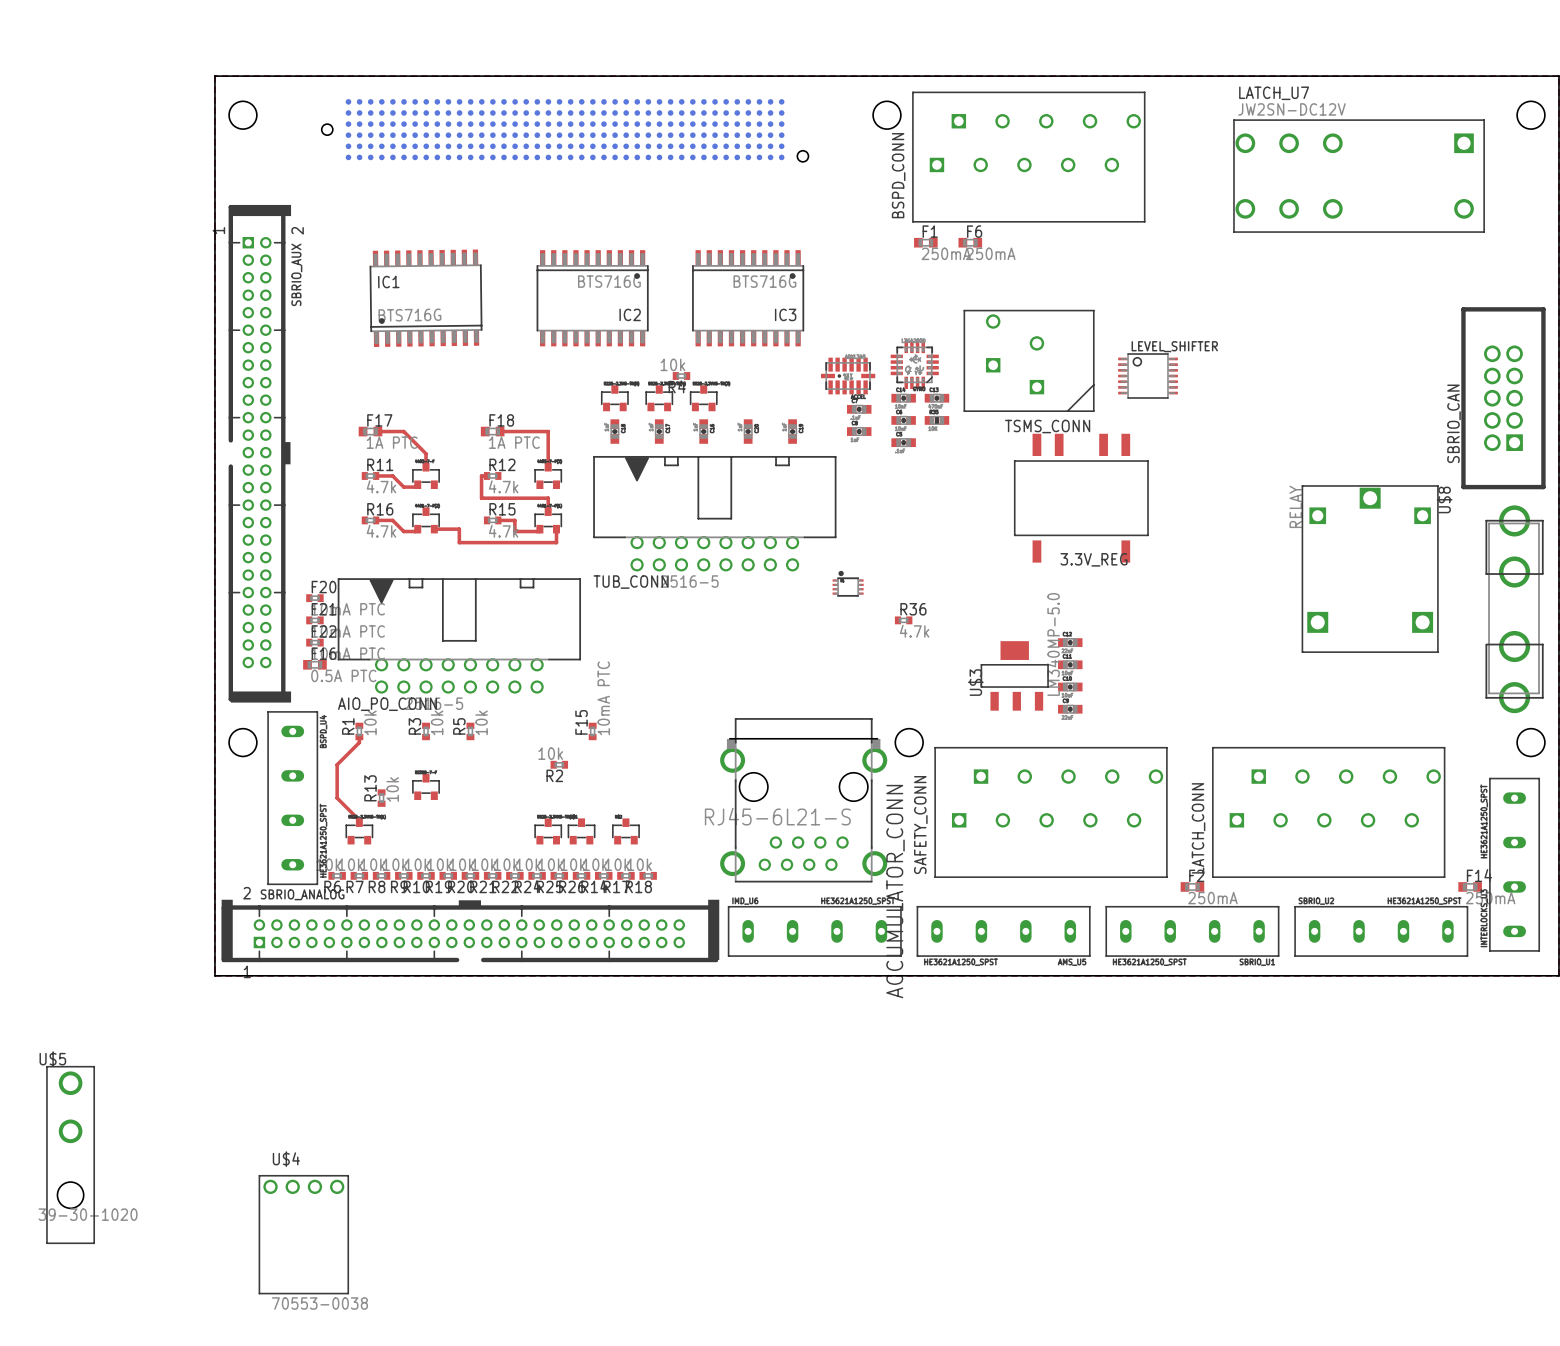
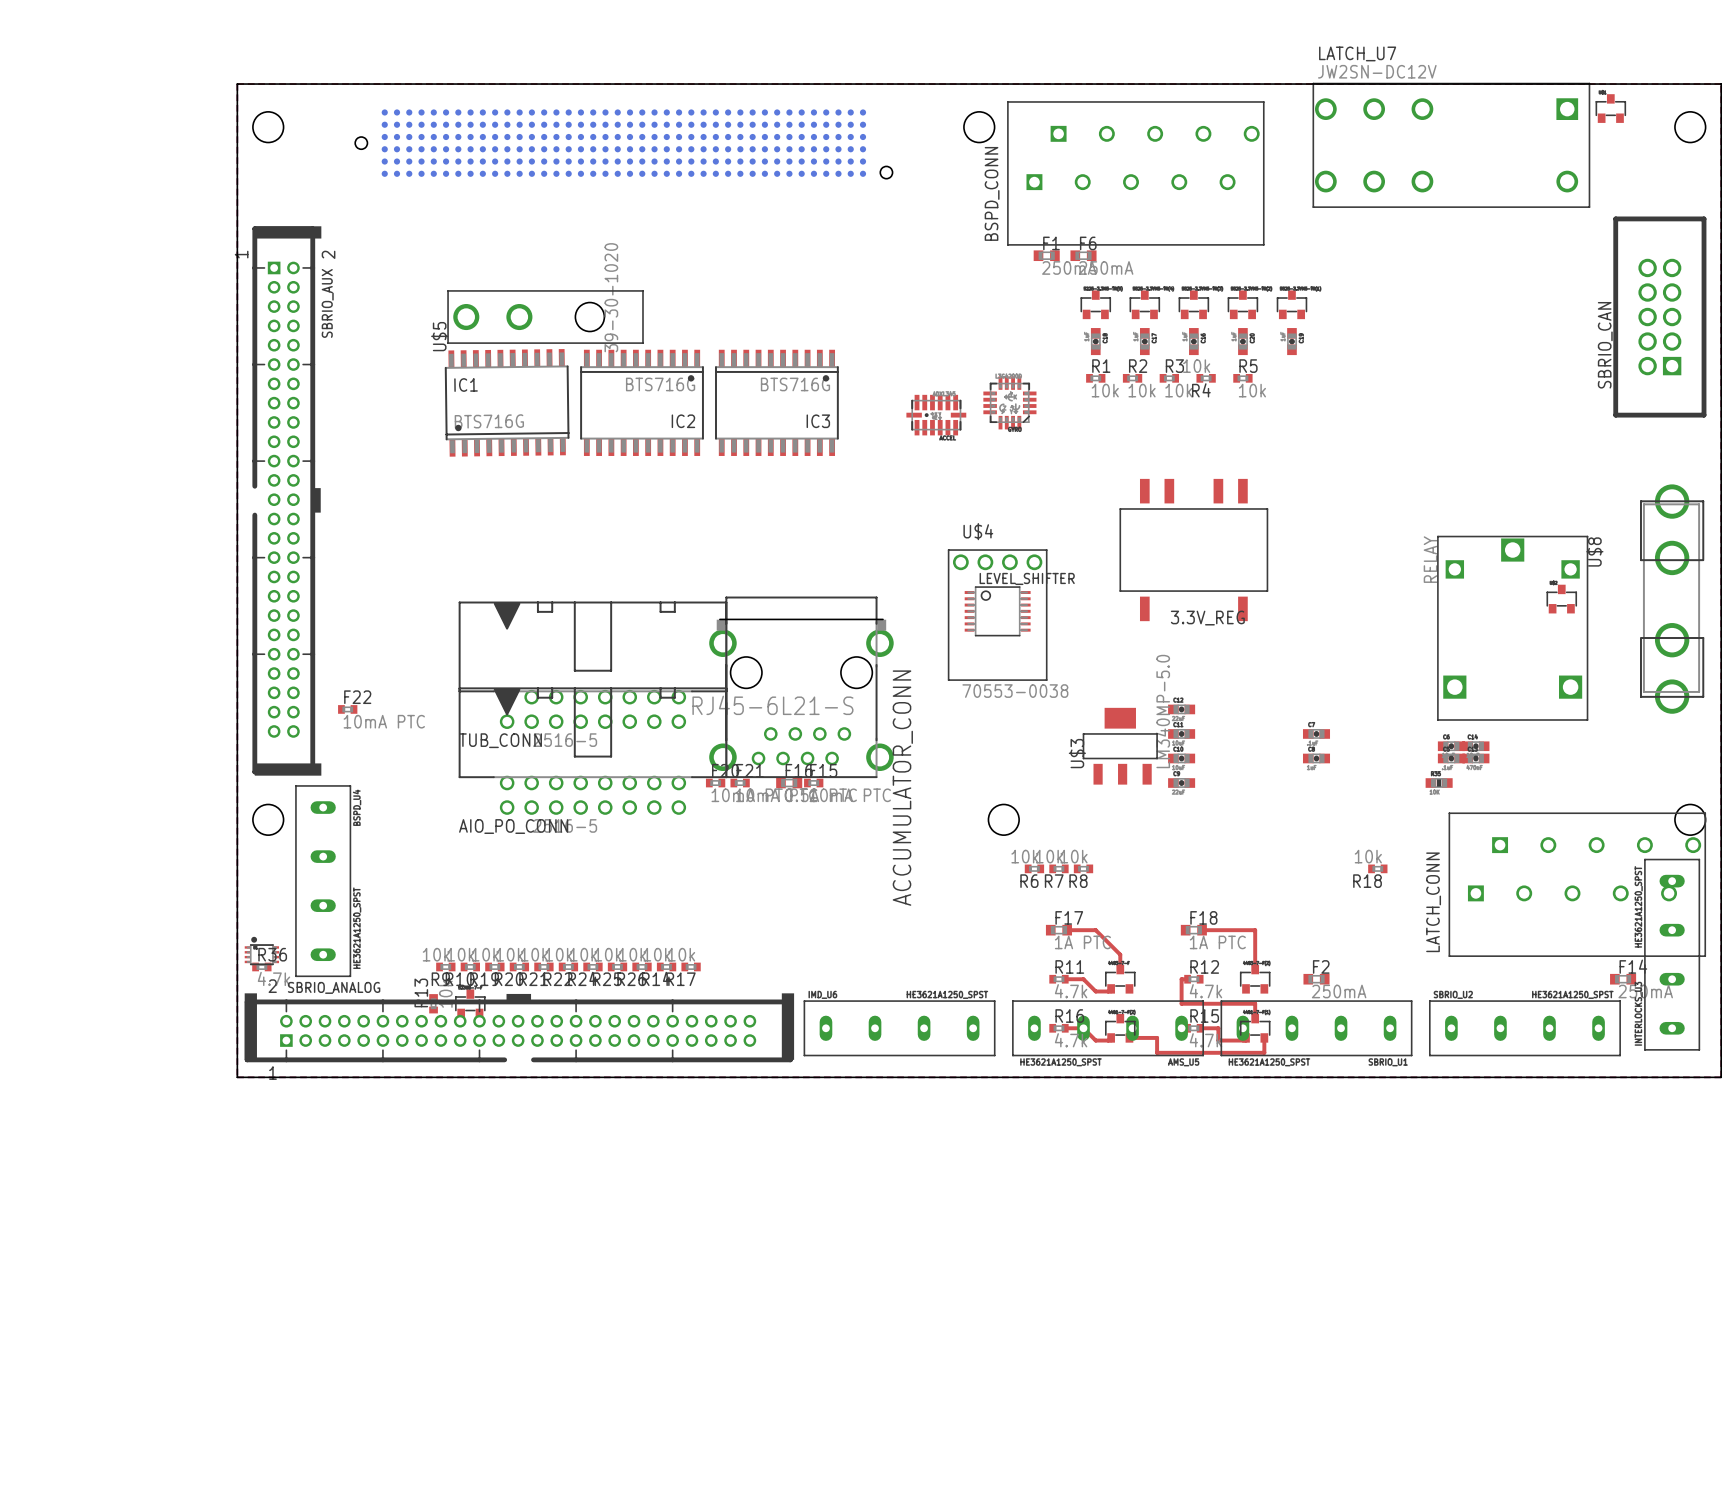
LATCH_U7 position: (1359, 176) -> (1451, 145)
F1 position: (925, 242) -> (1046, 255)
F6 position: (970, 242) -> (1083, 255)
IC1 position: (426, 298) -> (507, 402)
IC2 position: (592, 298) -> (642, 402)
IC3 position: (748, 298) -> (776, 402)
TSMS_CONN: (1029, 360) -> none
R4 position: (681, 376) -> (1206, 378)
LEVEL_SHIFTER: (1148, 376) -> none
part position: (614, 398) -> (1095, 304)
part position: (659, 398) -> (1144, 304)
part position: (703, 398) -> (1193, 304)
part position: (903, 398) -> (1475, 746)
part position: (936, 398) -> (1475, 758)
SBRIO_CAN position: (1503, 398) -> (1659, 317)
part position: (859, 409) -> (1316, 733)
part position: (903, 420) -> (1451, 746)
part position: (936, 420) -> (1439, 783)
F17 position: (370, 431) -> (1058, 930)
top track: (377, 431) (403, 431) (426, 453) (426, 467) -> none
F18 position: (492, 431) -> (1193, 930)
top track: (500, 431) (548, 431) (548, 467) -> none
part position: (614, 431) -> (1095, 341)
part position: (659, 431) -> (1144, 341)
part position: (703, 431) -> (1193, 341)
part position: (748, 431) -> (1242, 341)
part position: (792, 431) -> (1291, 341)
part position: (859, 431) -> (1316, 758)
part position: (903, 442) -> (1451, 758)
R11 position: (370, 475) -> (1058, 979)
top track: (376, 475) (392, 475) (403, 487) (415, 487) (417, 484) (417, 487) -> none
part position: (426, 475) -> (1120, 979)
top track: (486, 475) (481, 475) (481, 498) (548, 498) (548, 511) -> none
R12 position: (492, 475) -> (1193, 979)
part position: (548, 475) -> (1255, 979)
TUB_CONN position: (714, 513) -> (592, 665)
R16 position: (370, 520) -> (1058, 1028)
top track: (376, 520) (392, 520) (403, 531) (415, 531) (417, 529) (417, 531) -> none
part position: (426, 520) -> (1120, 1028)
R15 position: (492, 520) -> (1193, 1028)
top track: (498, 520) (514, 520) (514, 531) (539, 531) (539, 529) -> none
part position: (548, 520) -> (1255, 1028)
top track: (434, 529) (459, 529) (459, 542) (556, 542) (556, 529) -> none
LEVEL_SHIFTER: none -> (997, 611)
part position: (848, 583) -> (261, 950)
F20 position: (314, 598) -> (715, 783)
part position: (1514, 609) -> (1672, 599)
F21 position: (314, 620) -> (740, 783)
R36 position: (903, 620) -> (261, 966)
AIO_PO_CONN position: (459, 635) -> (592, 751)
F16 position: (314, 664) -> (789, 783)
R1 rotation: 0° (359, 731) -> 90° clockwise (1095, 378)
R1 position: (359, 731) -> (1095, 378)
R3 rotation: 0° (426, 731) -> 90° clockwise (1169, 378)
R3 position: (426, 731) -> (1169, 378)
R5 rotation: 0° (470, 731) -> 90° clockwise (1242, 378)
R5 position: (470, 731) -> (1242, 378)
F15 rotation: 0° (592, 731) -> 90° clockwise (813, 783)
F15 position: (592, 731) -> (813, 783)
top track: (359, 737) (359, 742) (337, 764) (337, 798) (359, 820) (359, 822) -> none
R2 value position: 10k (550, 753) -> 10k (1142, 390)
R2 position: (559, 764) -> (1132, 378)
R2 name position: R2 (554, 775) -> R2 (1138, 366)
part position: (426, 786) -> (470, 1003)
R13 position: (381, 798) -> (433, 1003)
ACCUMULATOR_CONN position: (803, 800) -> (801, 687)
SAFETY_CONN: (1051, 812) -> none
LATCH_CONN position: (1328, 812) -> (1577, 884)
part position: (359, 831) -> (1291, 304)
part position: (548, 831) -> (1242, 304)
part position: (581, 831) -> (1610, 108)
part position: (625, 831) -> (1561, 599)
top track: none -> (1067, 930) (1095, 930) (1120, 954) (1120, 969)
top track: none -> (1202, 930) (1255, 930) (1255, 969)
R6 position: (337, 875) -> (1034, 868)
R7 position: (359, 875) -> (1058, 868)
R8 position: (381, 875) -> (1083, 868)
R18 position: (648, 875) -> (1377, 868)
top track: none -> (1065, 979) (1083, 979) (1095, 991) (1108, 991) (1111, 988) (1111, 991)
top track: none -> (1187, 979) (1181, 979) (1181, 1003) (1255, 1003) (1255, 1018)
top track: none -> (1065, 1028) (1083, 1028) (1095, 1040) (1108, 1040) (1111, 1037) (1111, 1040)
top track: none -> (1200, 1028) (1218, 1028) (1218, 1040) (1246, 1040) (1246, 1037)
top track: none -> (1129, 1037) (1157, 1037) (1157, 1052) (1264, 1052) (1264, 1037)
U$5 rotation: 0° (70, 1154) -> 90° counterclockwise (545, 317)
U$5 position: (70, 1154) -> (545, 317)
U$4 position: (303, 1234) -> (997, 615)

